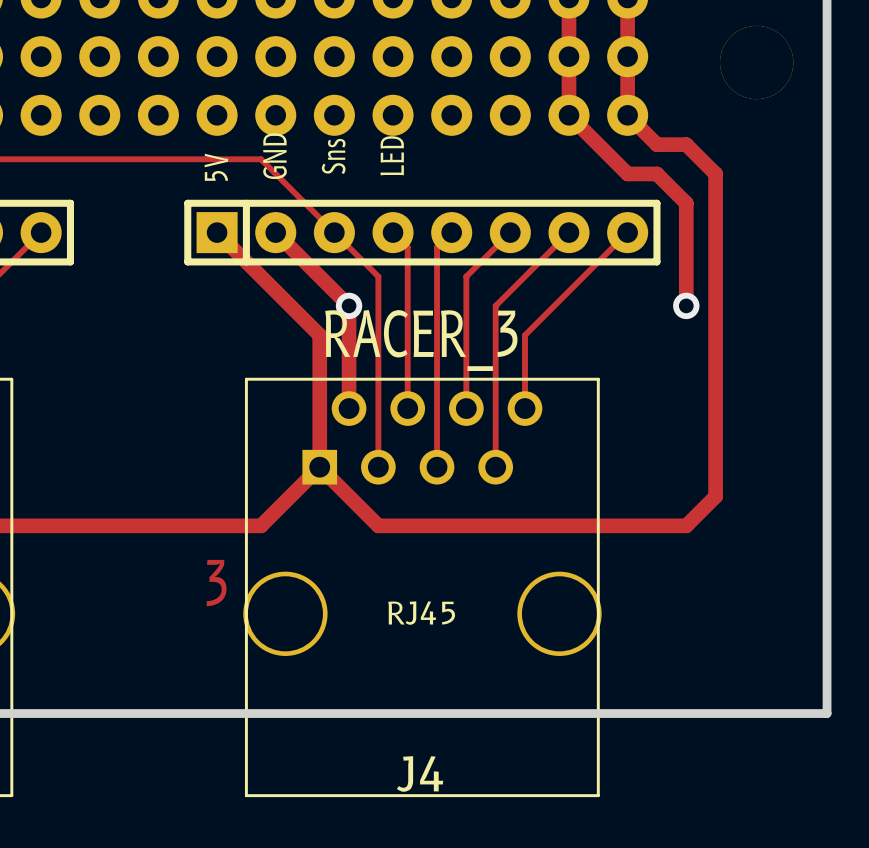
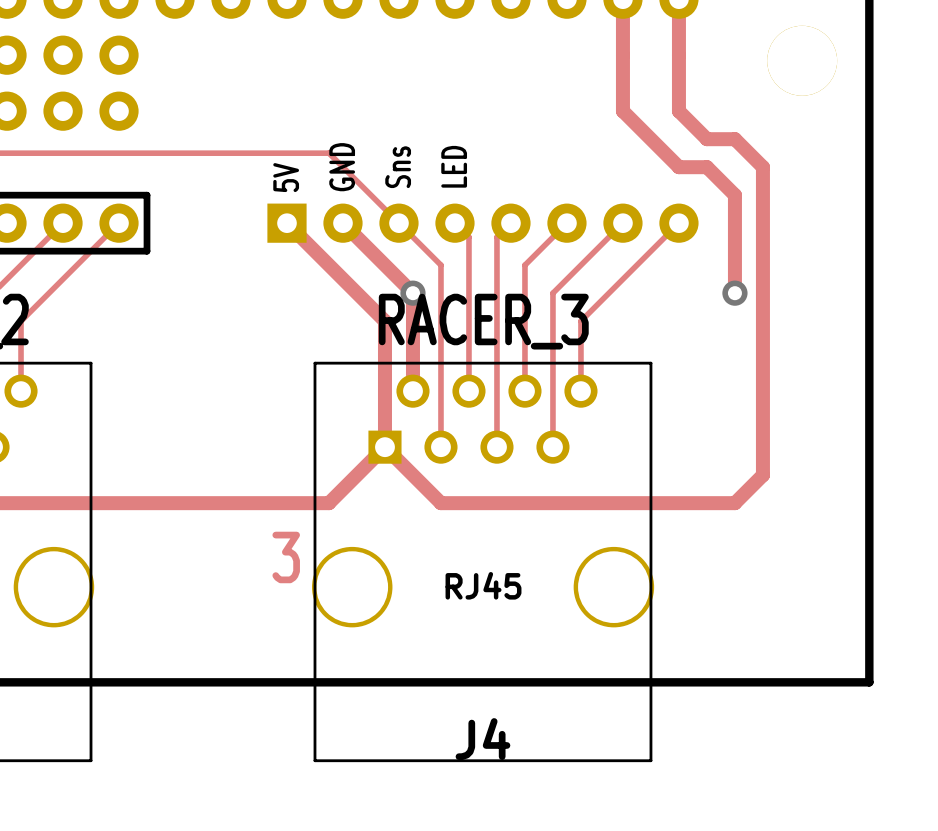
part: (99, 56) -> none
part: (158, 56) -> none
part: (217, 56) -> none
part: (275, 56) -> none
part: (334, 56) -> none
part: (393, 56) -> none
part: (451, 56) -> none
part: (510, 56) -> none
part: (568, 56) -> none
part: (627, 56) -> none
part: (99, 115) -> none
part: (158, 115) -> none
part: (217, 115) -> none
part: (275, 115) -> none
part: (334, 115) -> none
part: (393, 115) -> none
part: (451, 115) -> none
part: (510, 115) -> none
part: (568, 115) -> none
part: (627, 115) -> none
part footprint: [184, 199, 661, 266] -> [267, 203, 699, 243]

